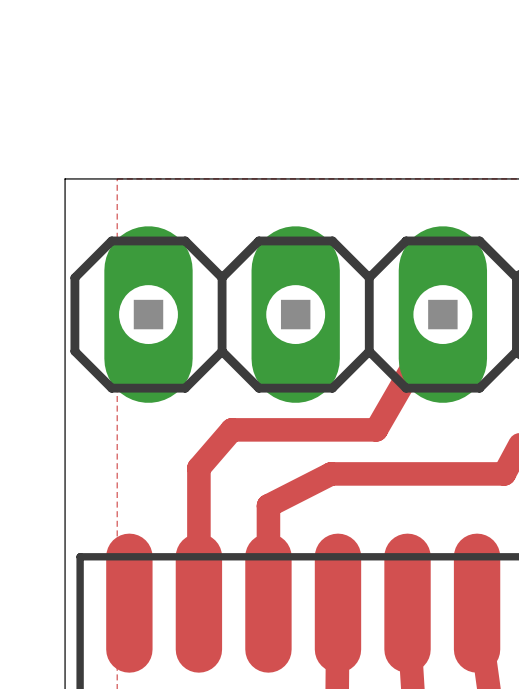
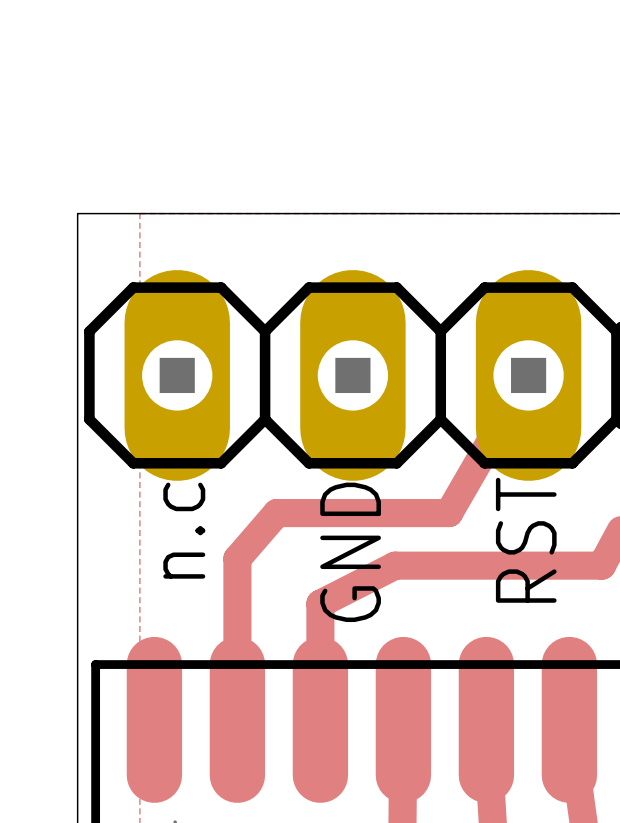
text: none -> RST (526, 540)
text: none -> n.c (184, 530)
text: none -> GND (350, 552)

